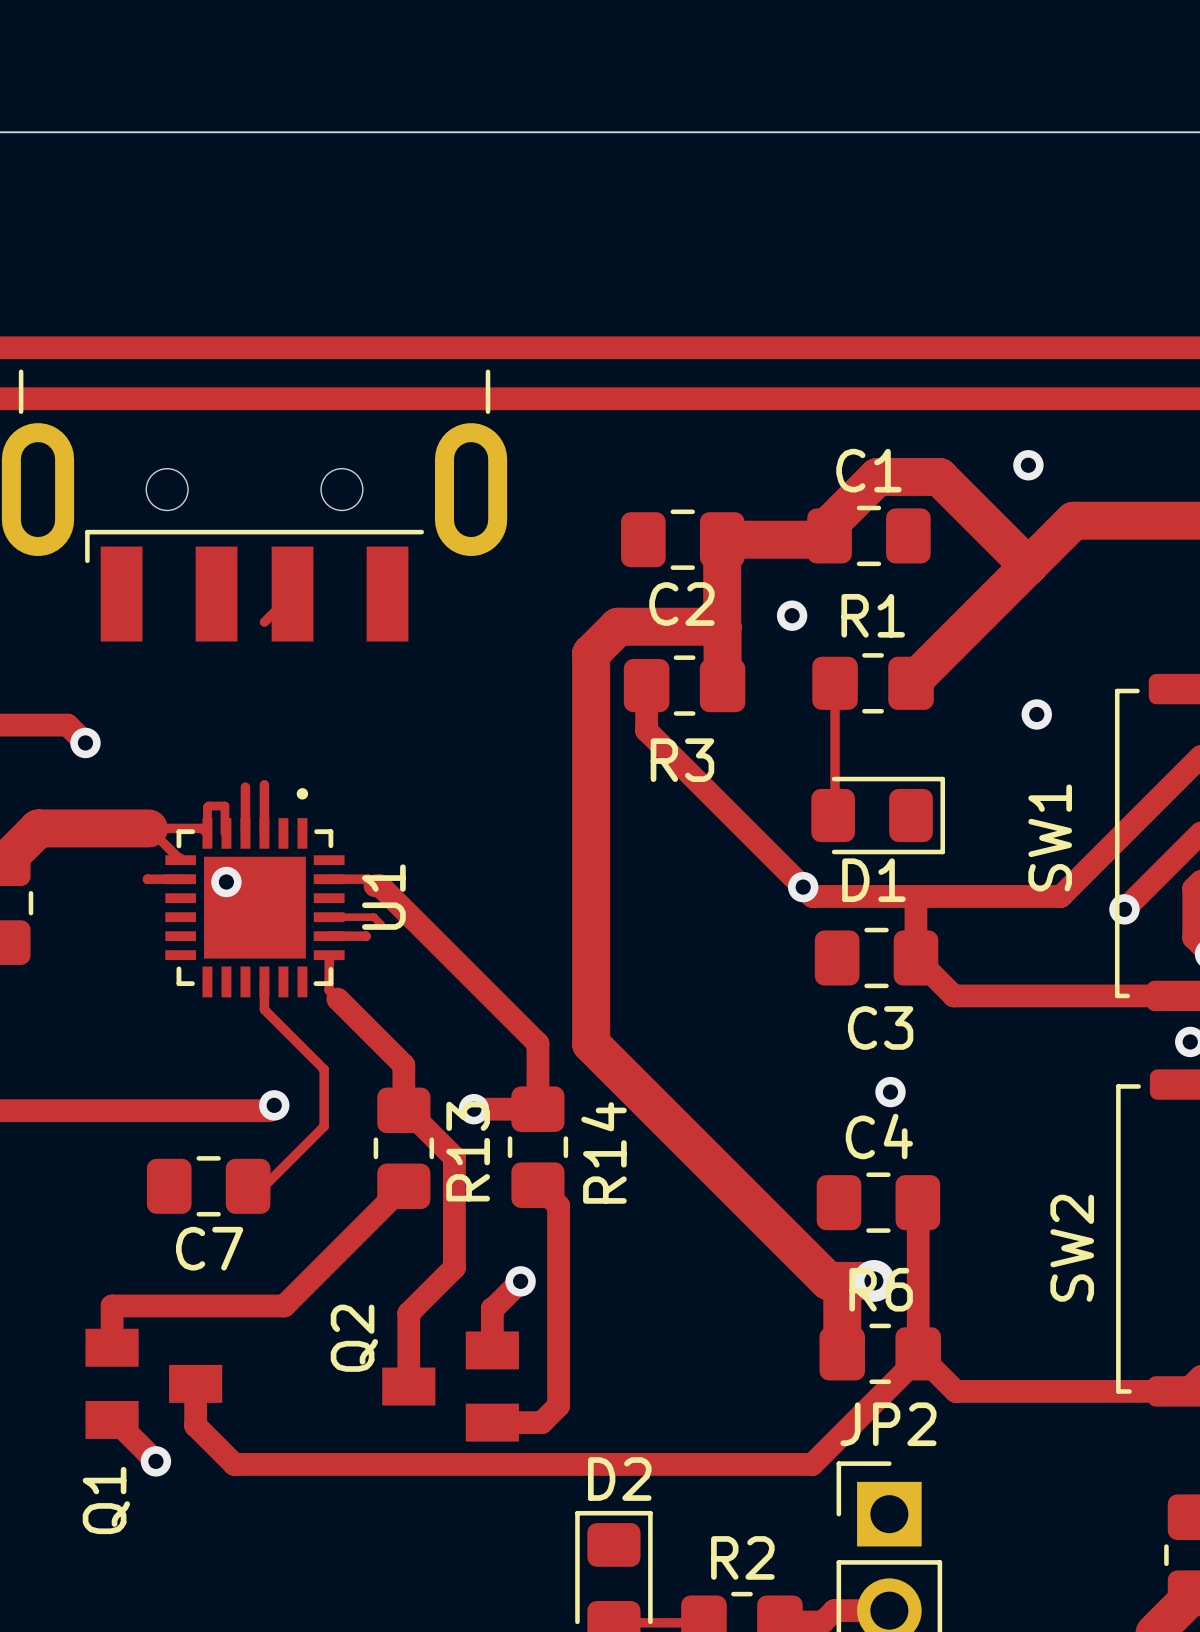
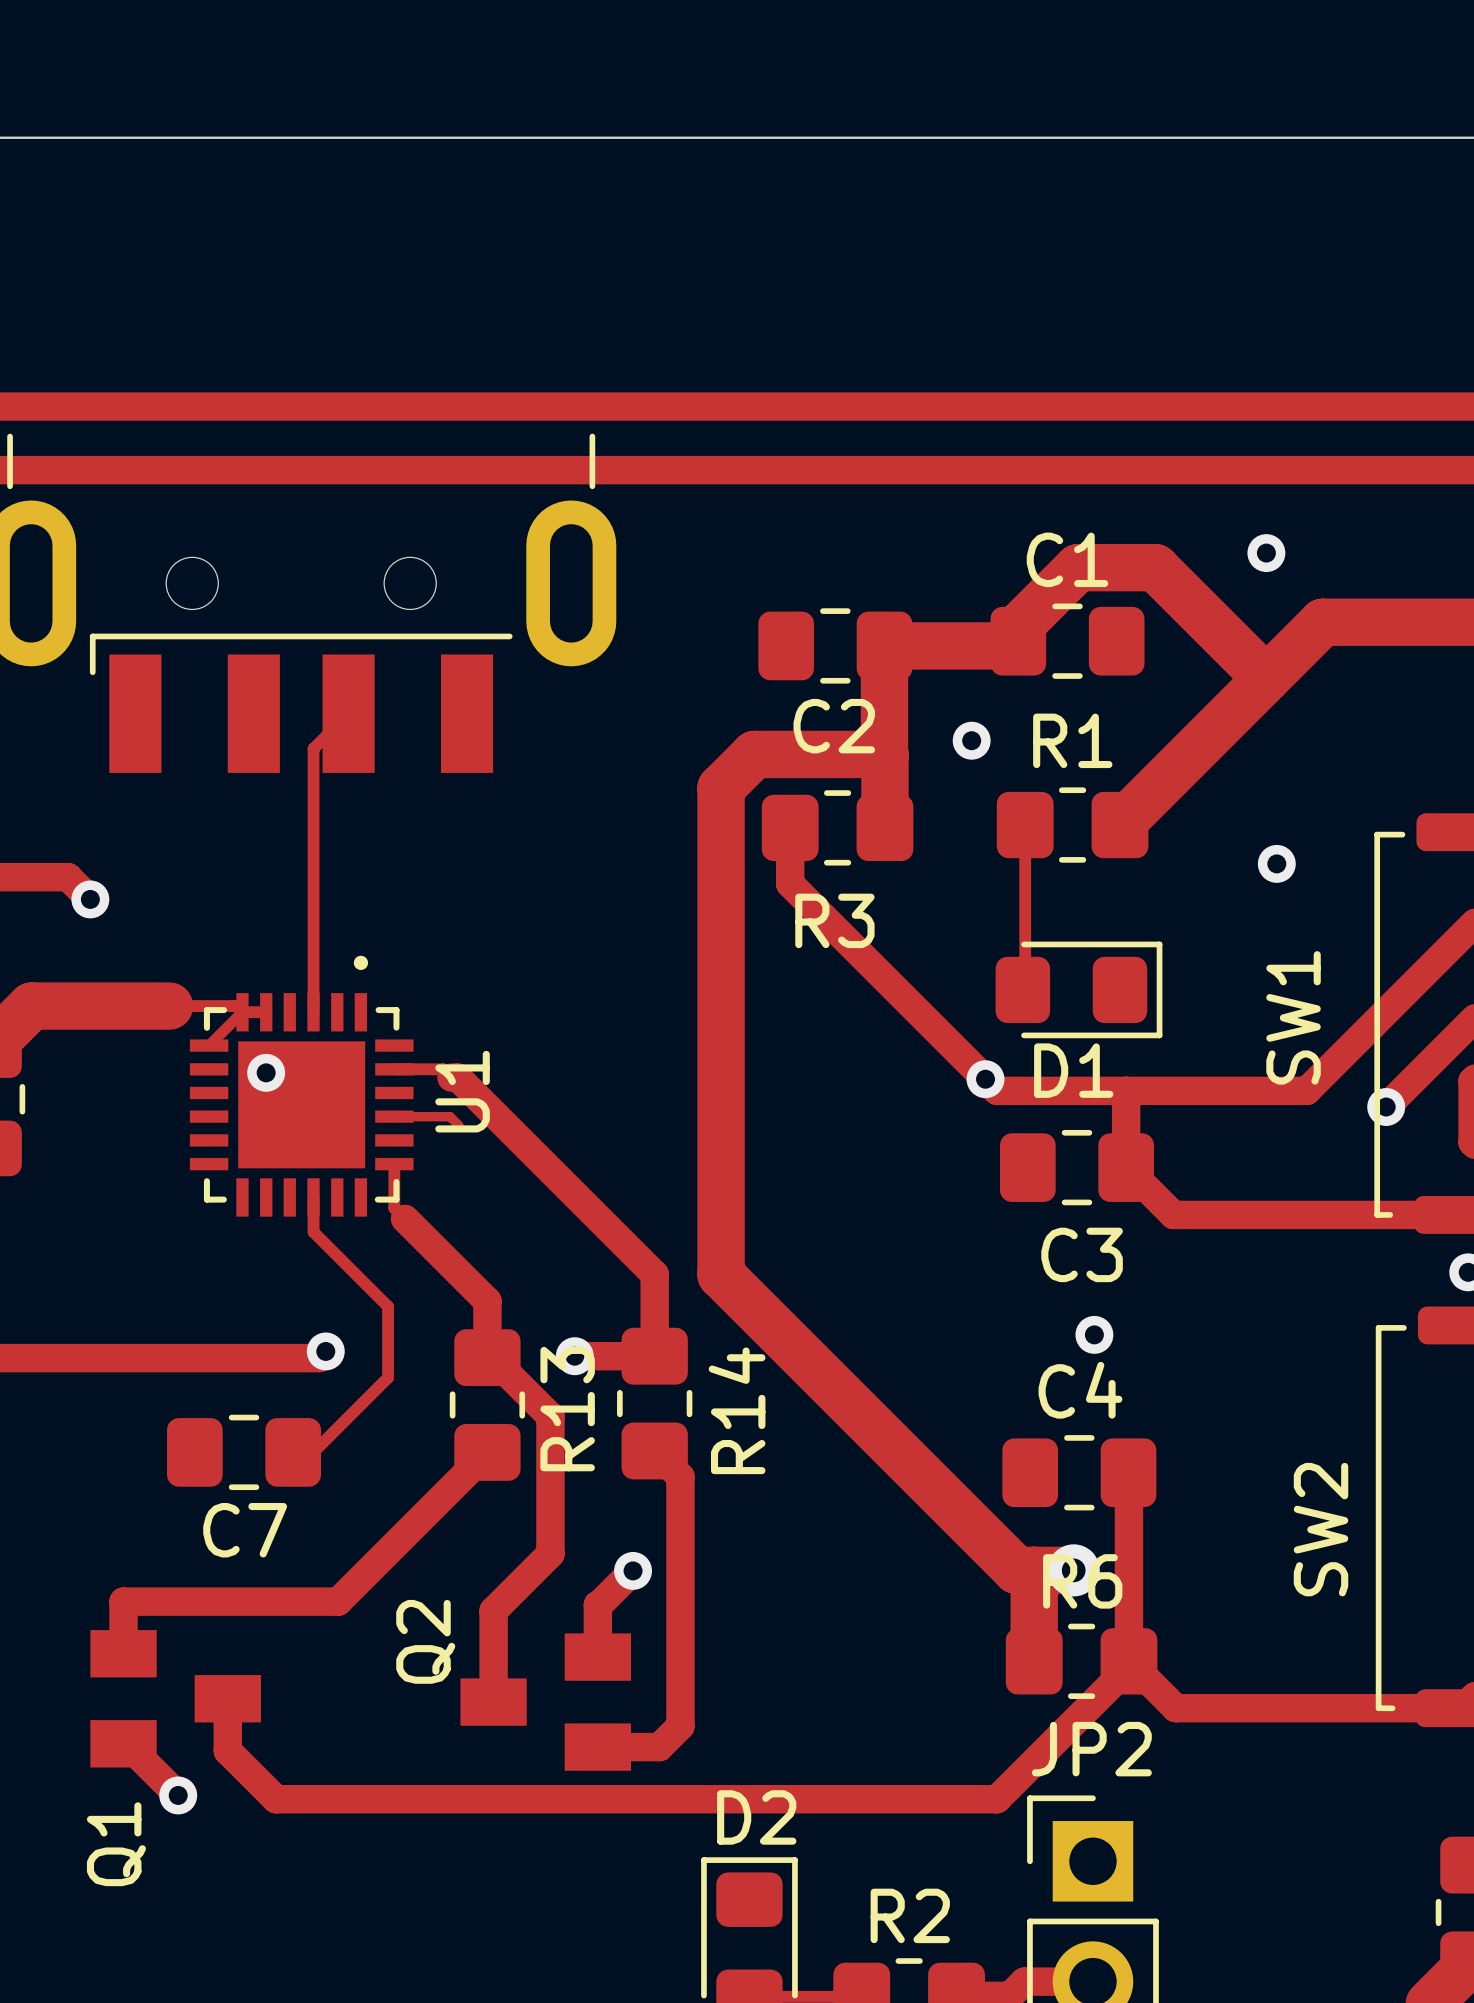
track: none -> (313, 748) (313, 951)
track: (245, 787) (245, 833) -> none
track: (148, 828) (180, 858) -> none
track: (207, 833) (208, 806) (224, 806) (224, 833) -> (209, 1045) (242, 1012) (266, 1012)
track: (147, 879) (180, 879) -> none
track: (329, 936) (365, 936) -> none

